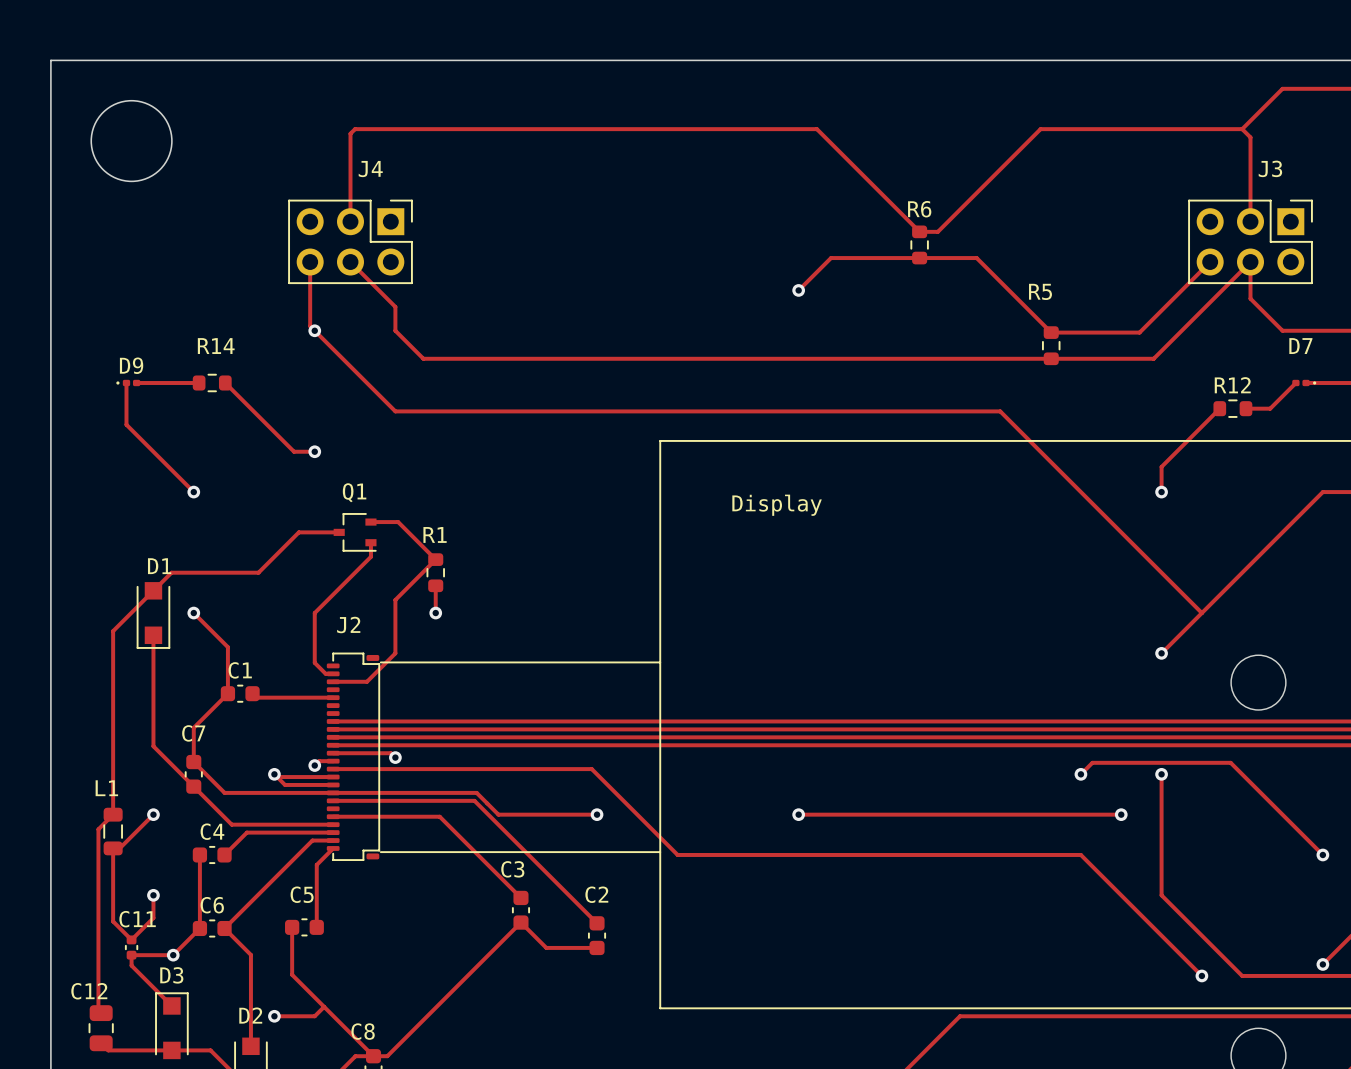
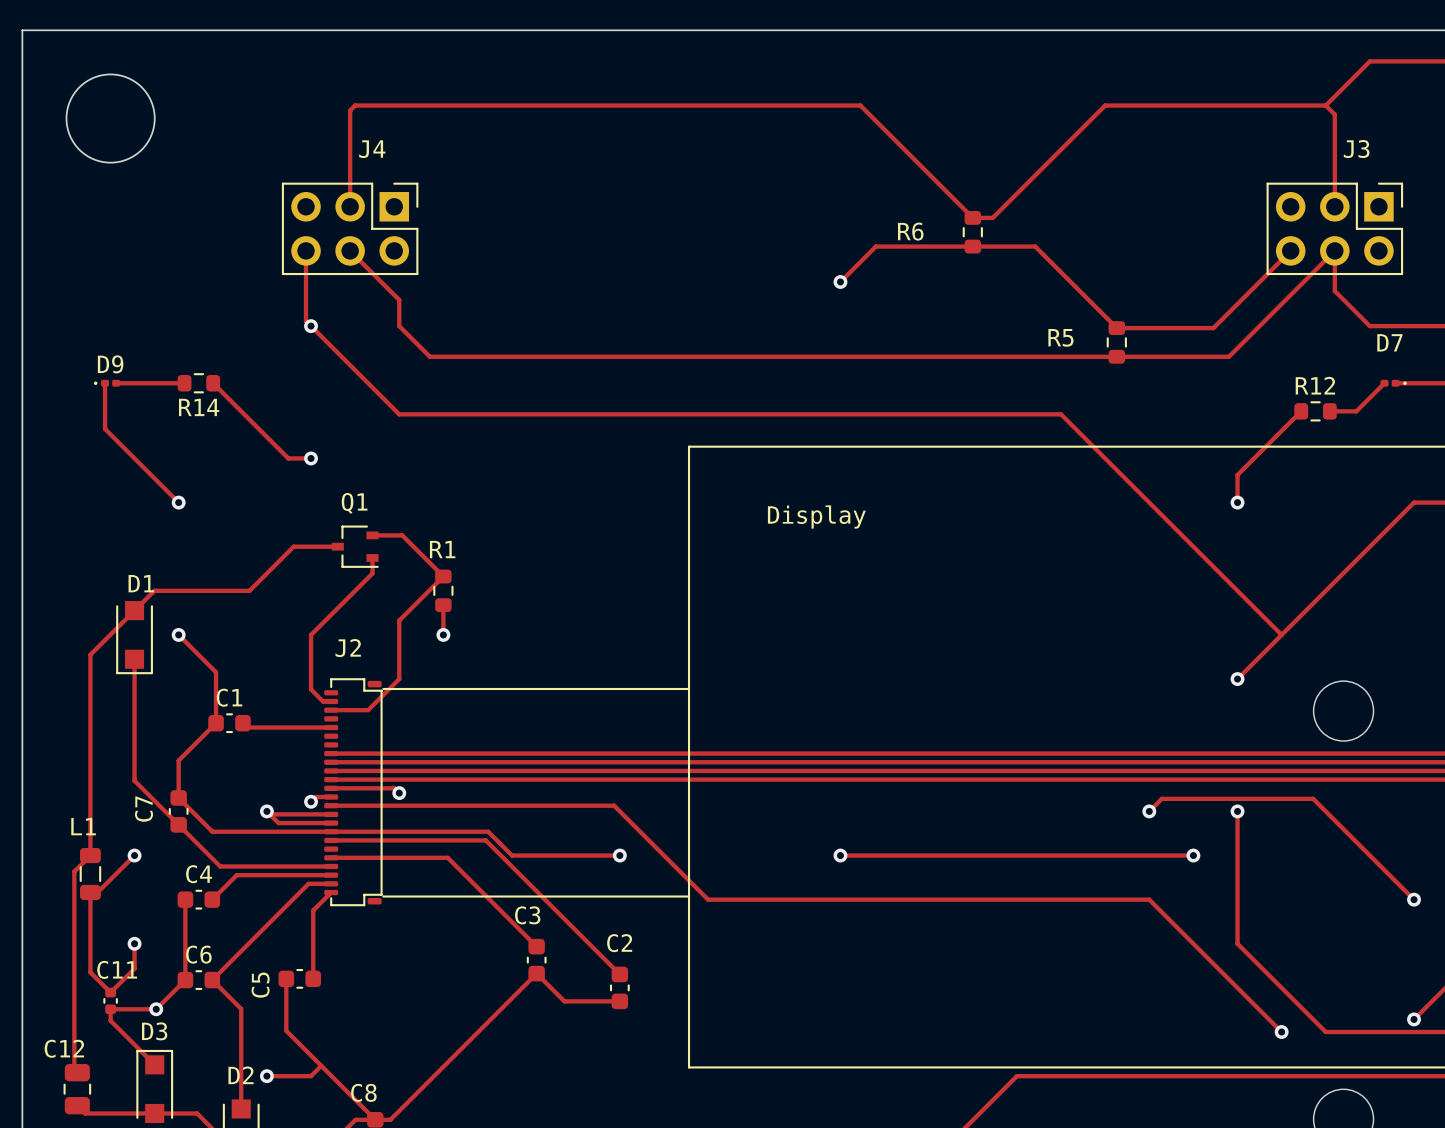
R6 name position: R6 (919, 209) -> R6 (910, 231)
R5 name position: R5 (1040, 291) -> R5 (1060, 337)
R14 name position: R14 (216, 346) -> R14 (199, 407)
C7 name rotation: 0° (193, 733) -> 90° counterclockwise (143, 809)
C7 name position: C7 (193, 733) -> C7 (143, 809)
C5 name rotation: 0° (302, 894) -> 90° counterclockwise (260, 985)
C5 name position: C5 (302, 894) -> C5 (260, 985)

